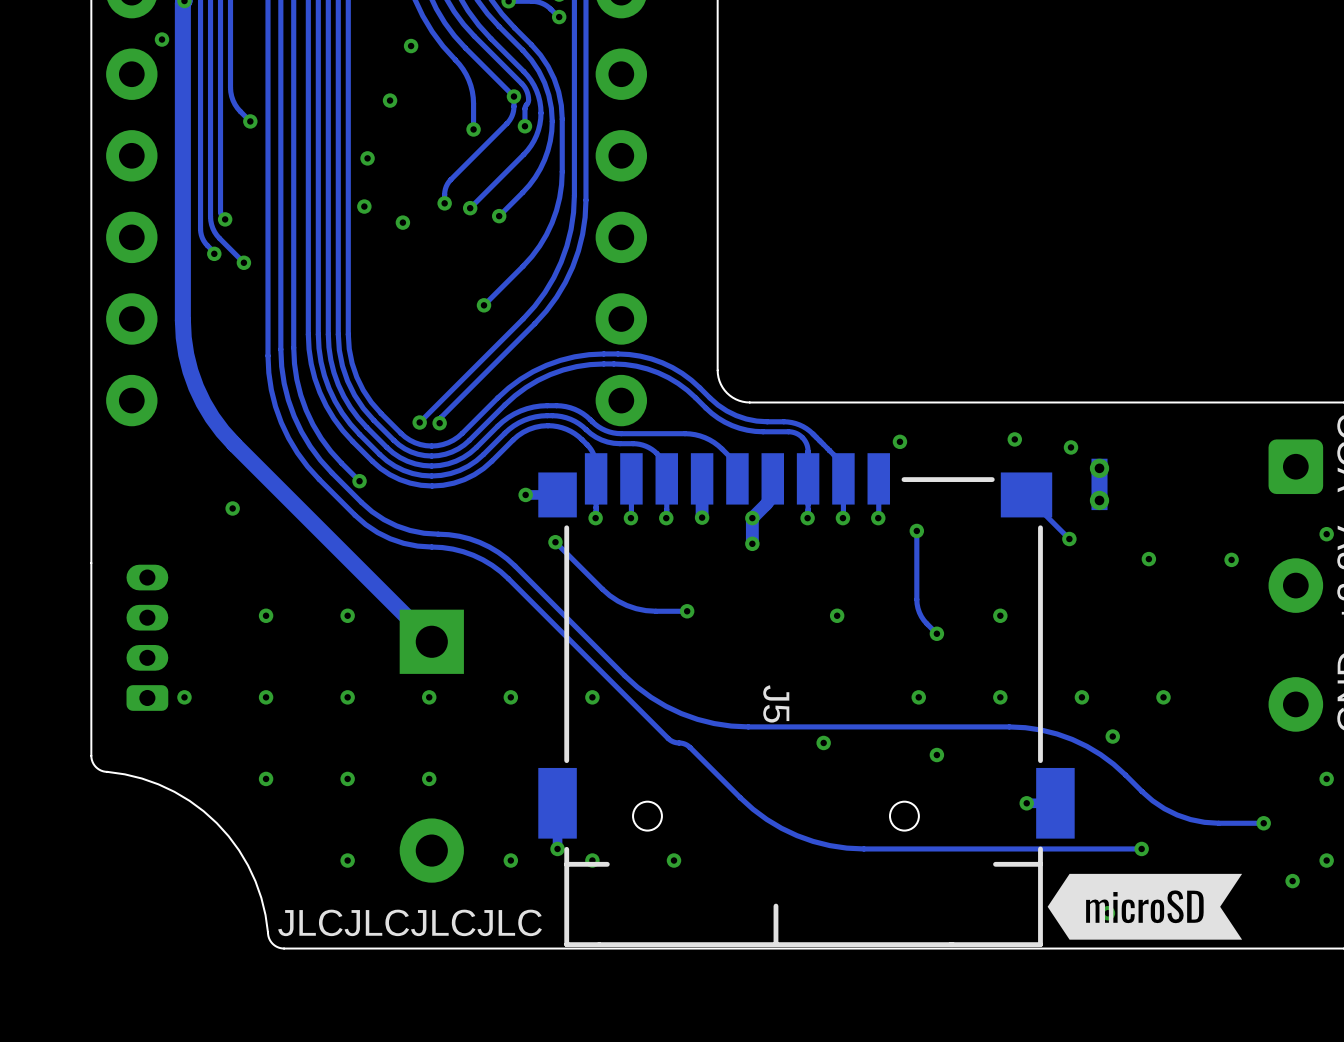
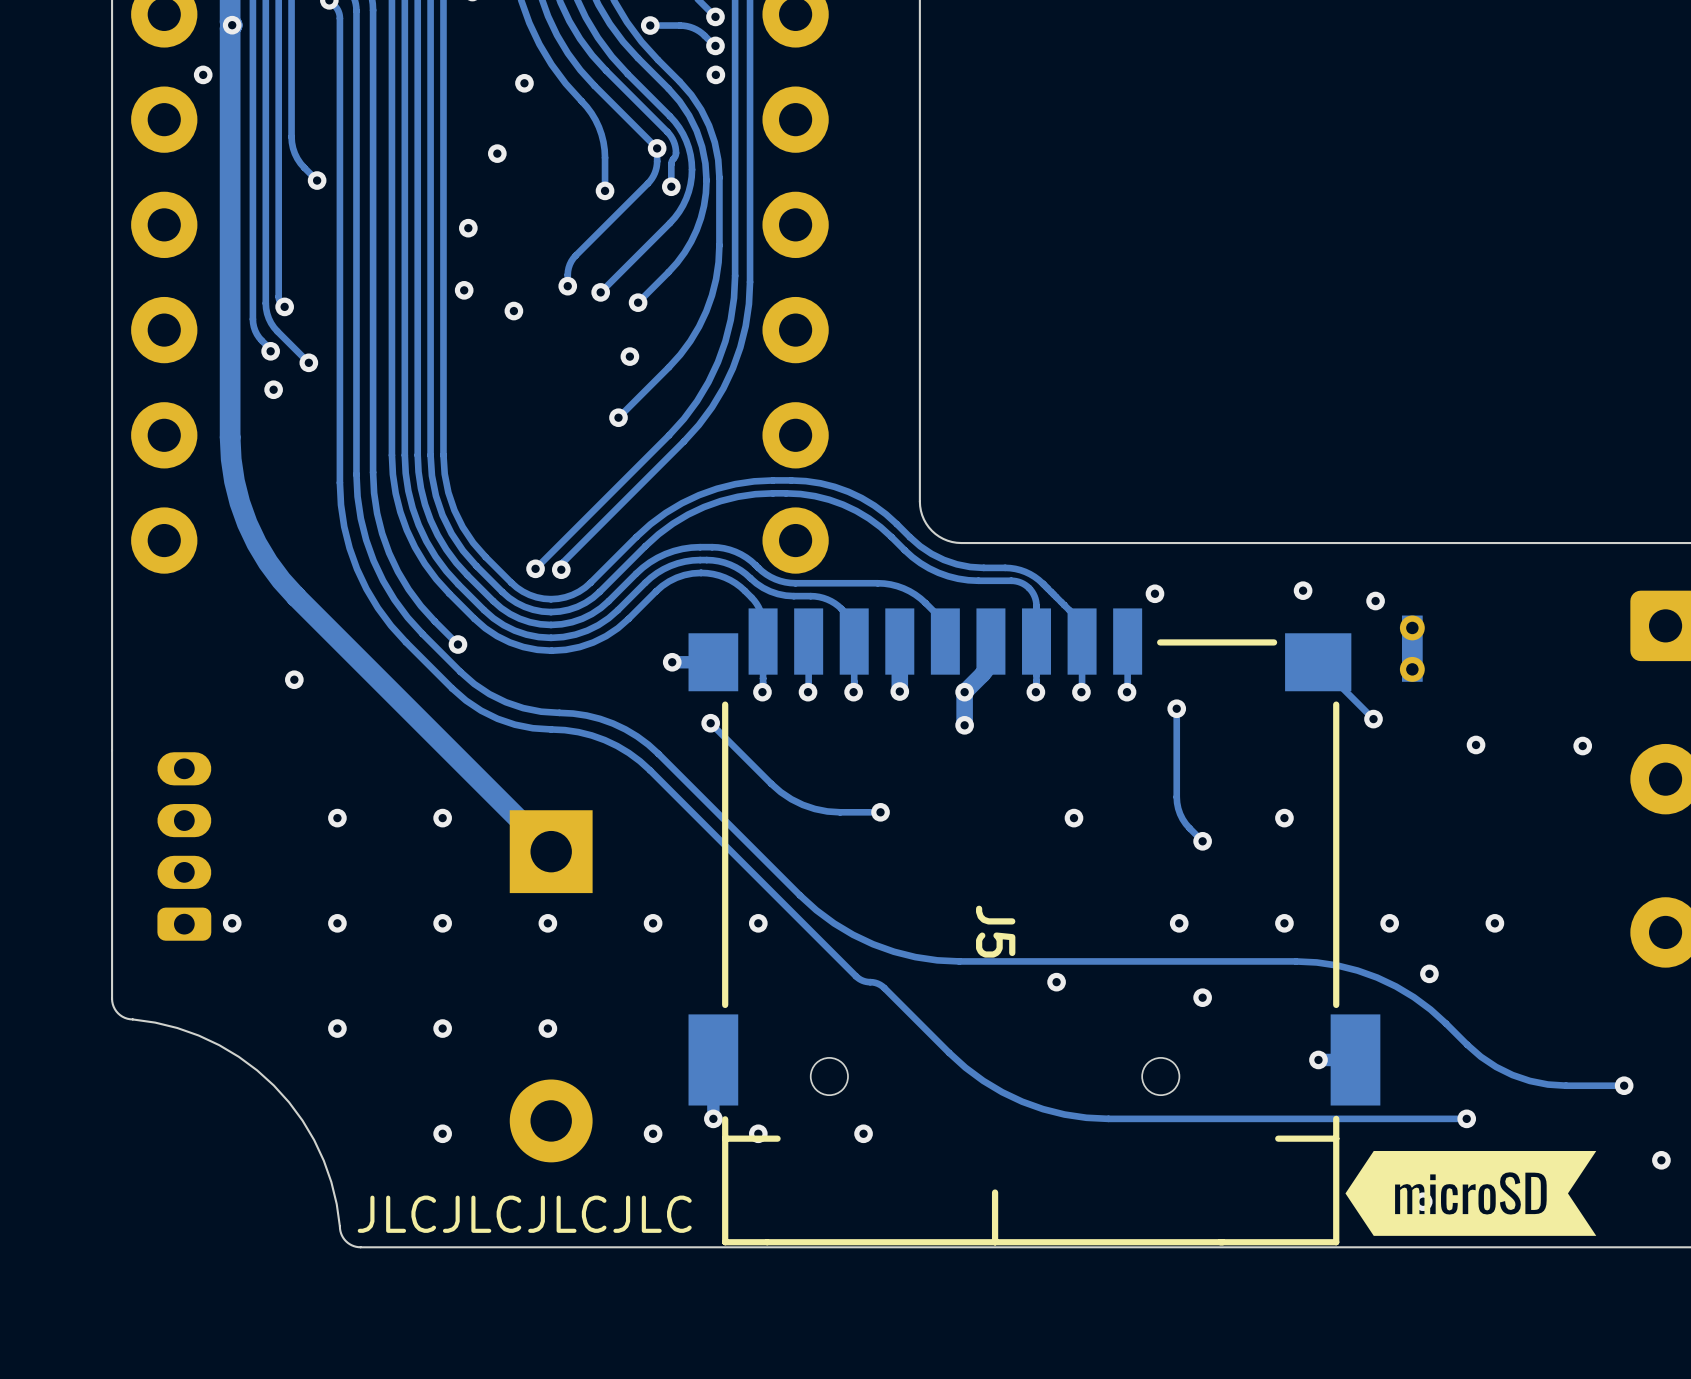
via: none -> (715, 74)
via: none -> (629, 356)
via: none -> (273, 389)

